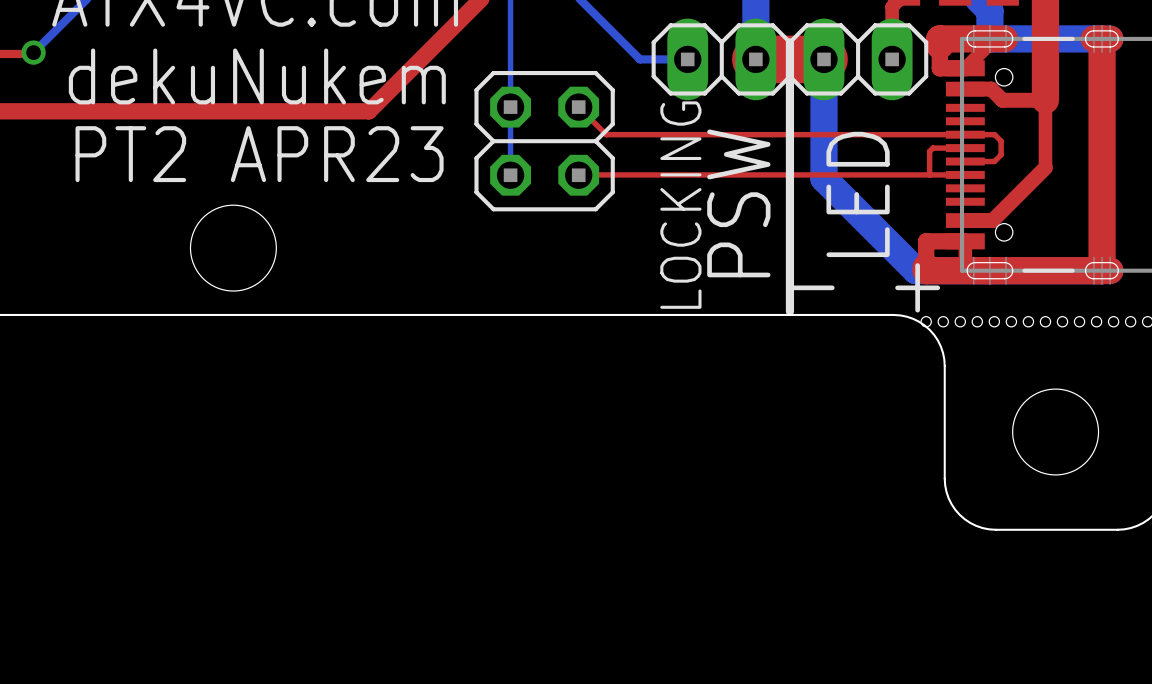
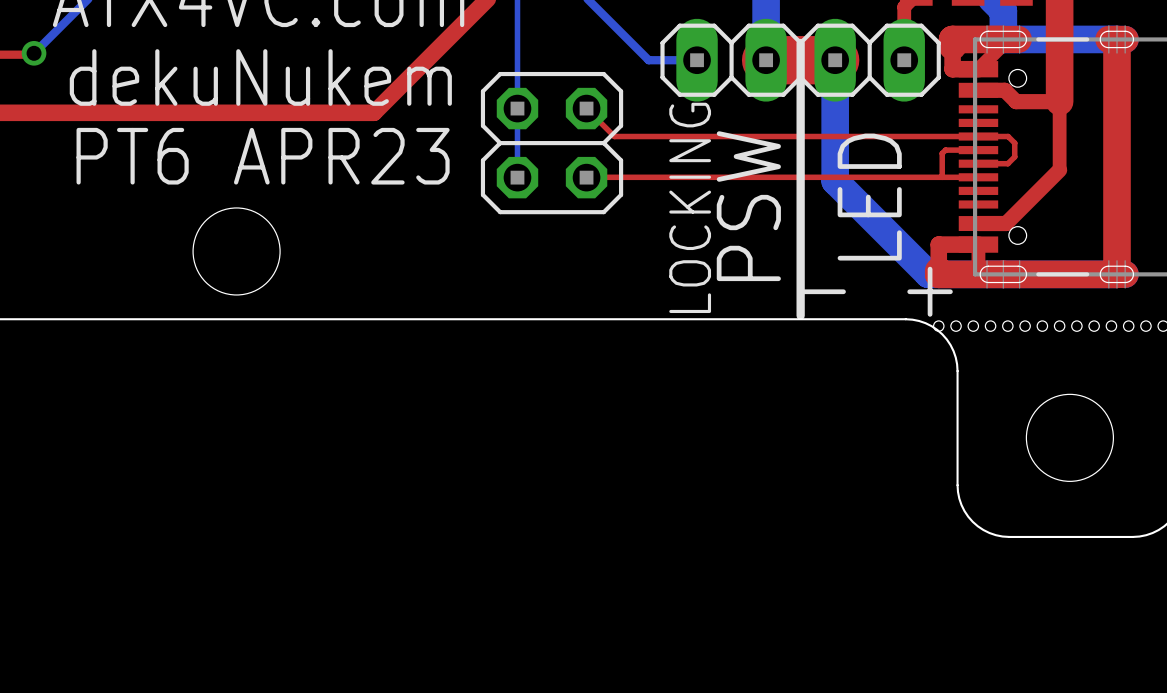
text: PT2 APR23 (259, 154) -> PT6 APR23 (263, 156)

